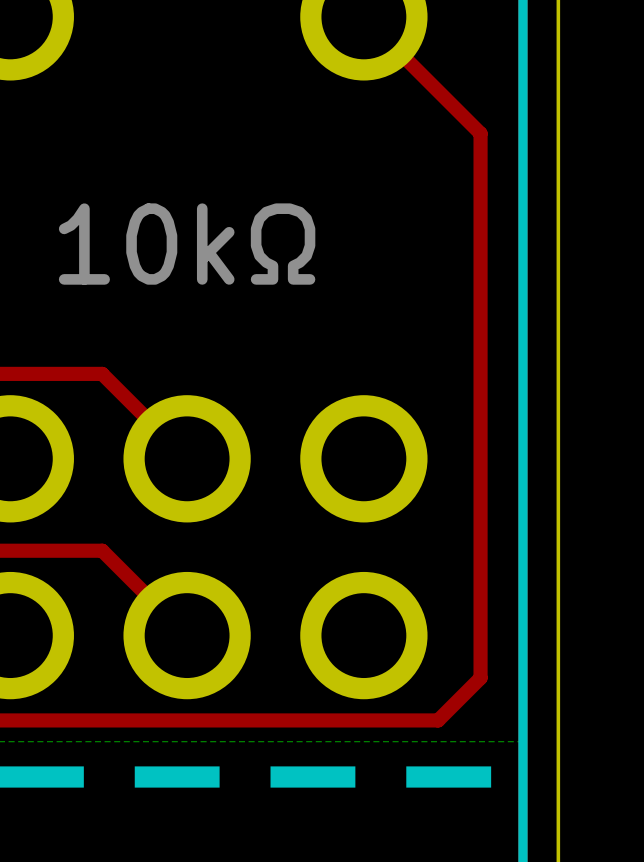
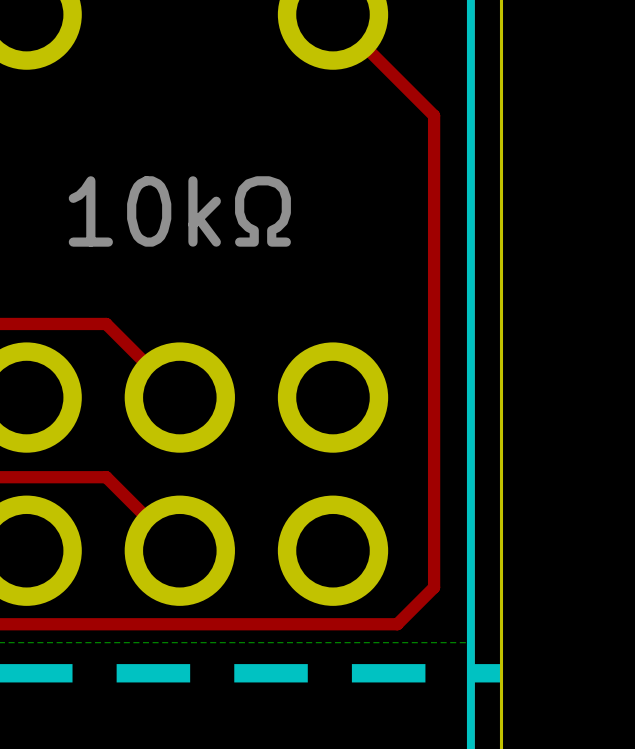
line: none -> (470, 673) (501, 673)

